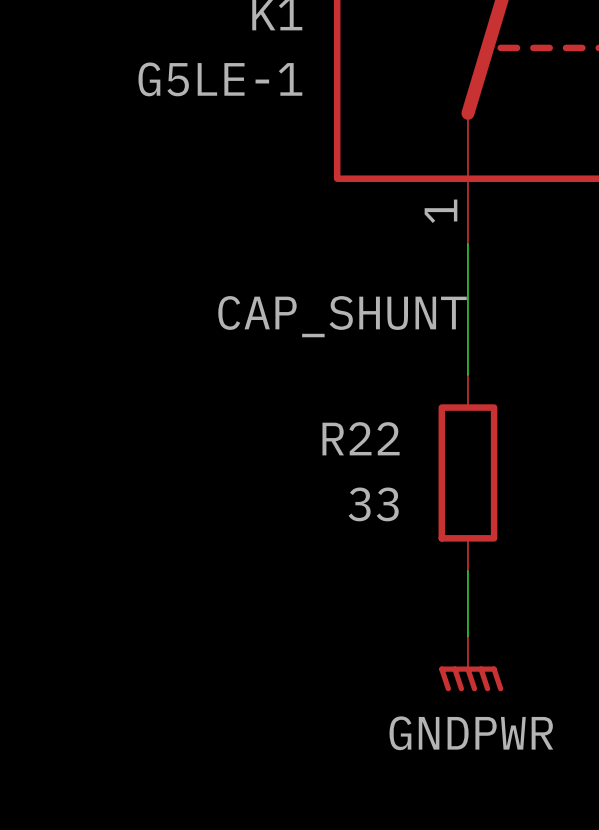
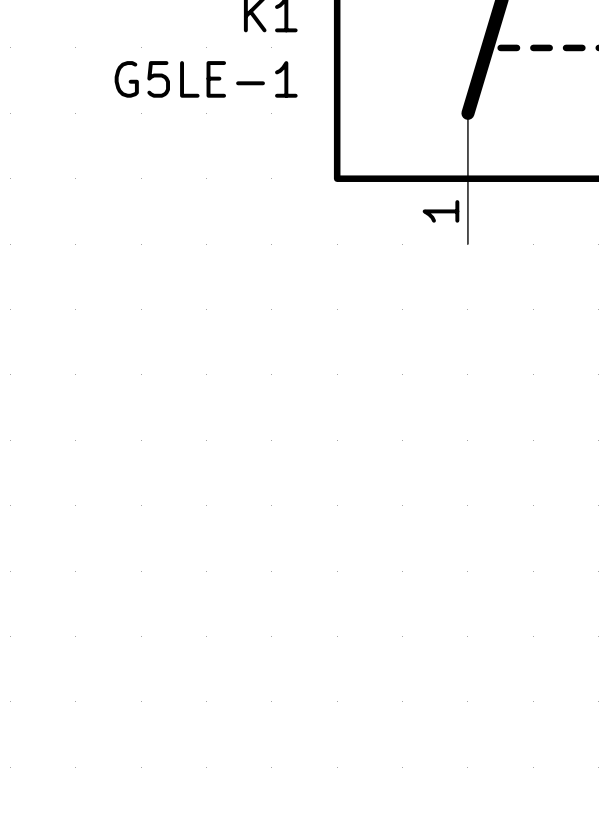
wire: (467, 244) (467, 374) -> none
label: CAP_SHUNT (342, 316) -> none
R22: 33 (467, 472) -> none
wire: (467, 571) (467, 636) -> none
power symbol: GNDPWR (471, 663) -> none

